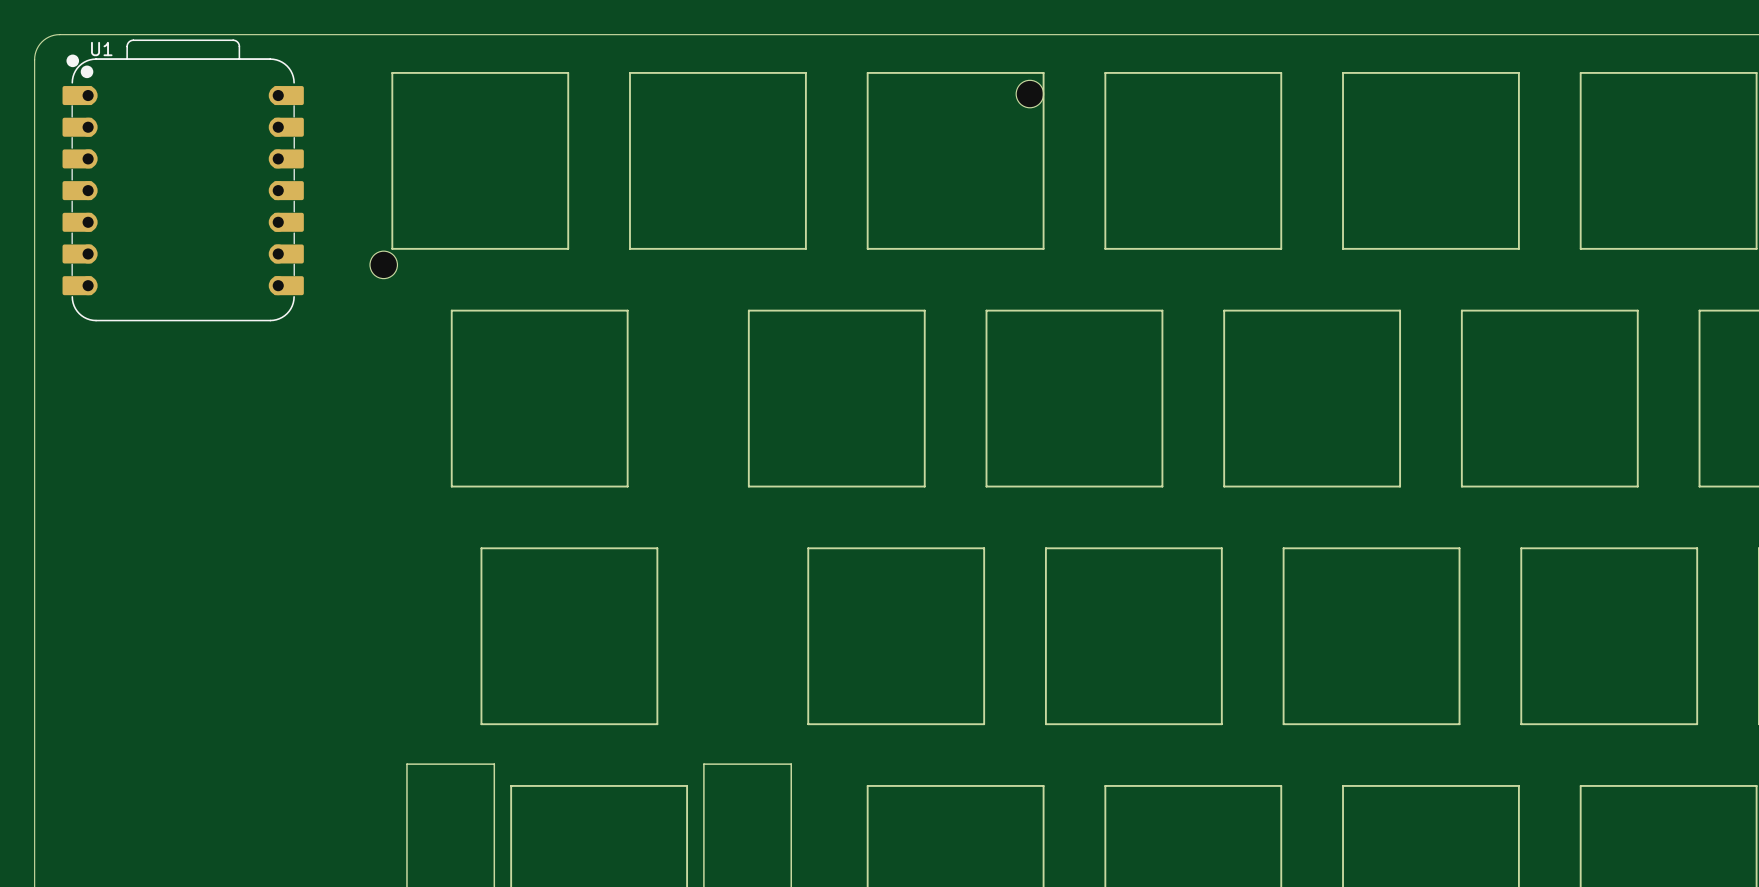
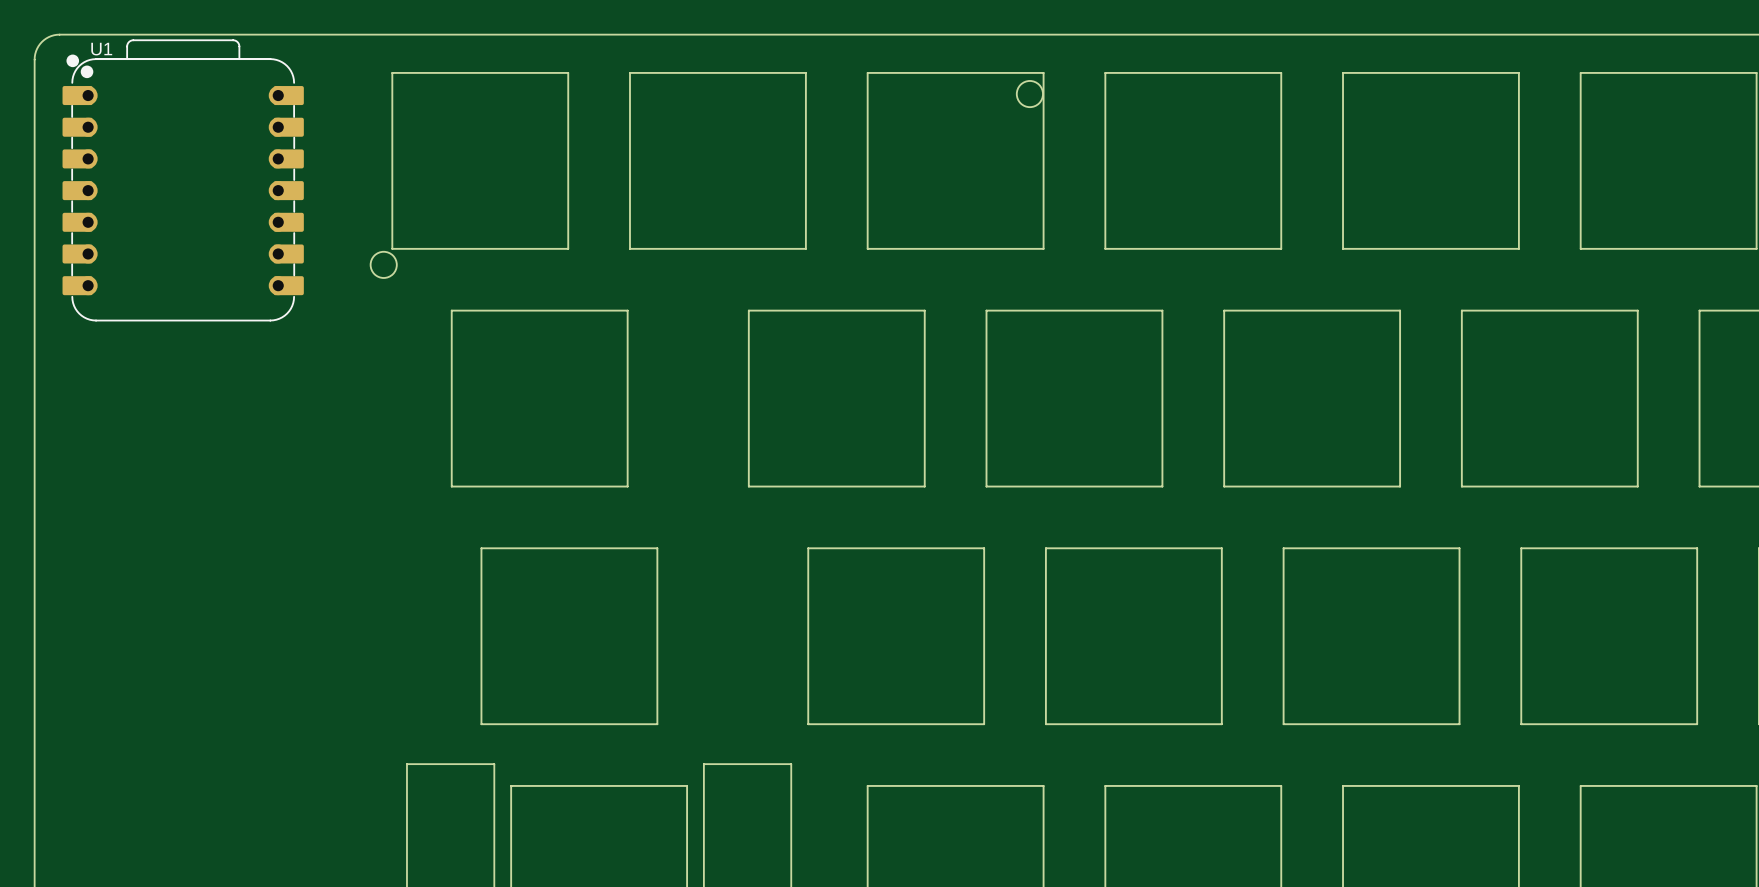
round board edge: none -> [1016, 80, 1044, 108]
part: (1029, 94) -> none
round board edge: none -> [370, 251, 398, 279]
part: (383, 264) -> none

